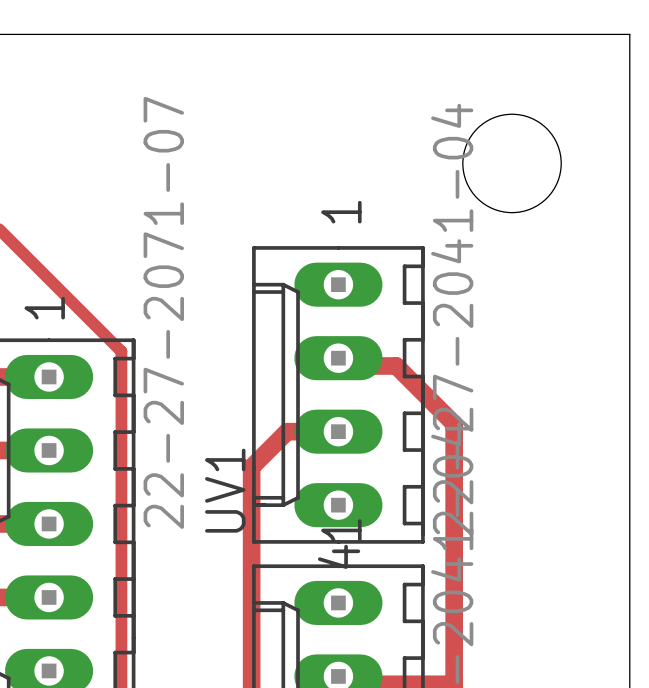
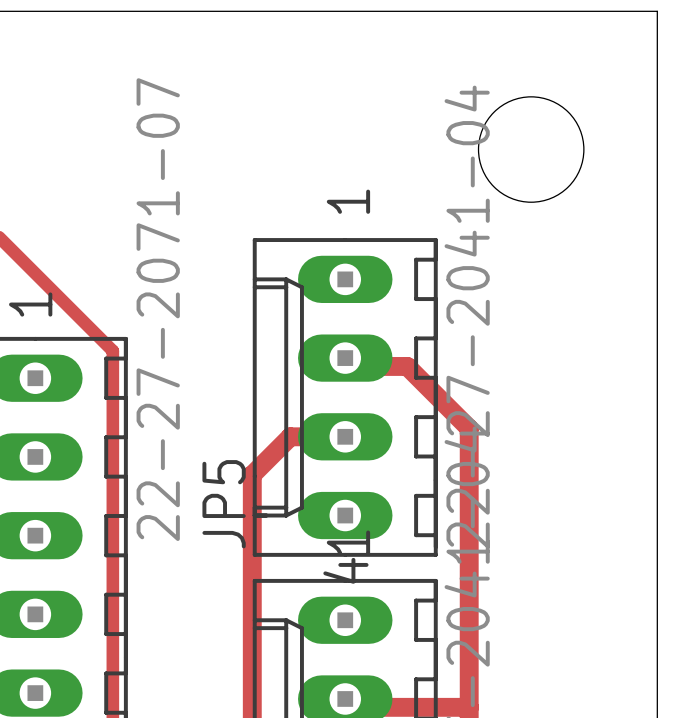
UV1 name: UV1 (225, 490) -> JP5 (224, 504)

